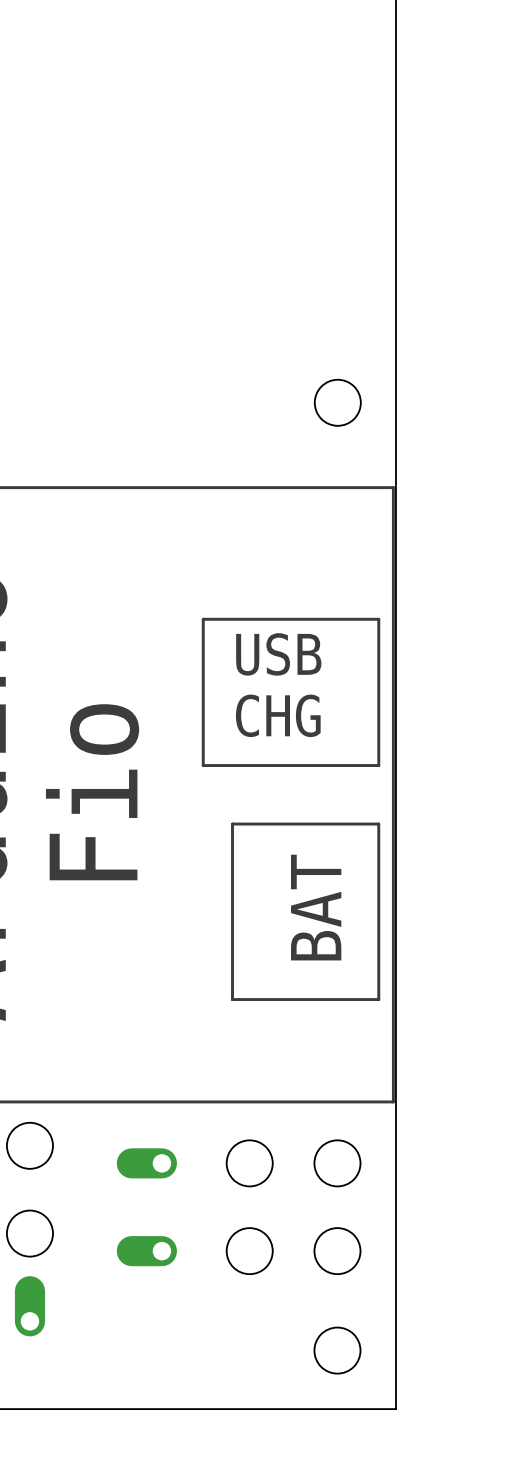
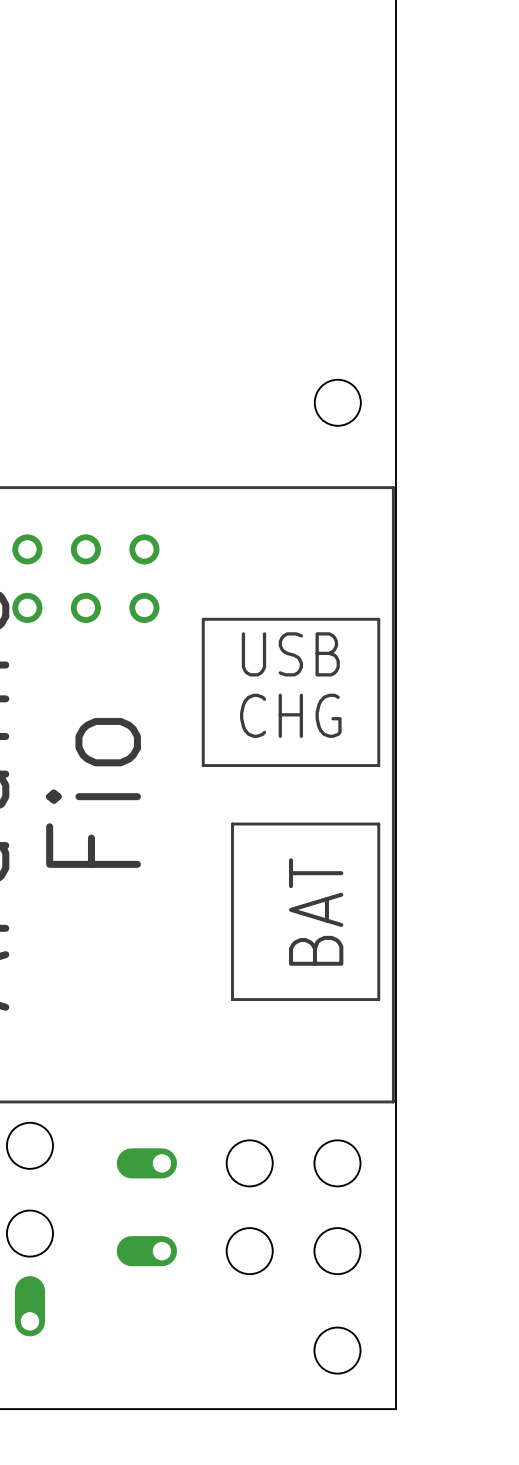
part: none -> (85, 578)

